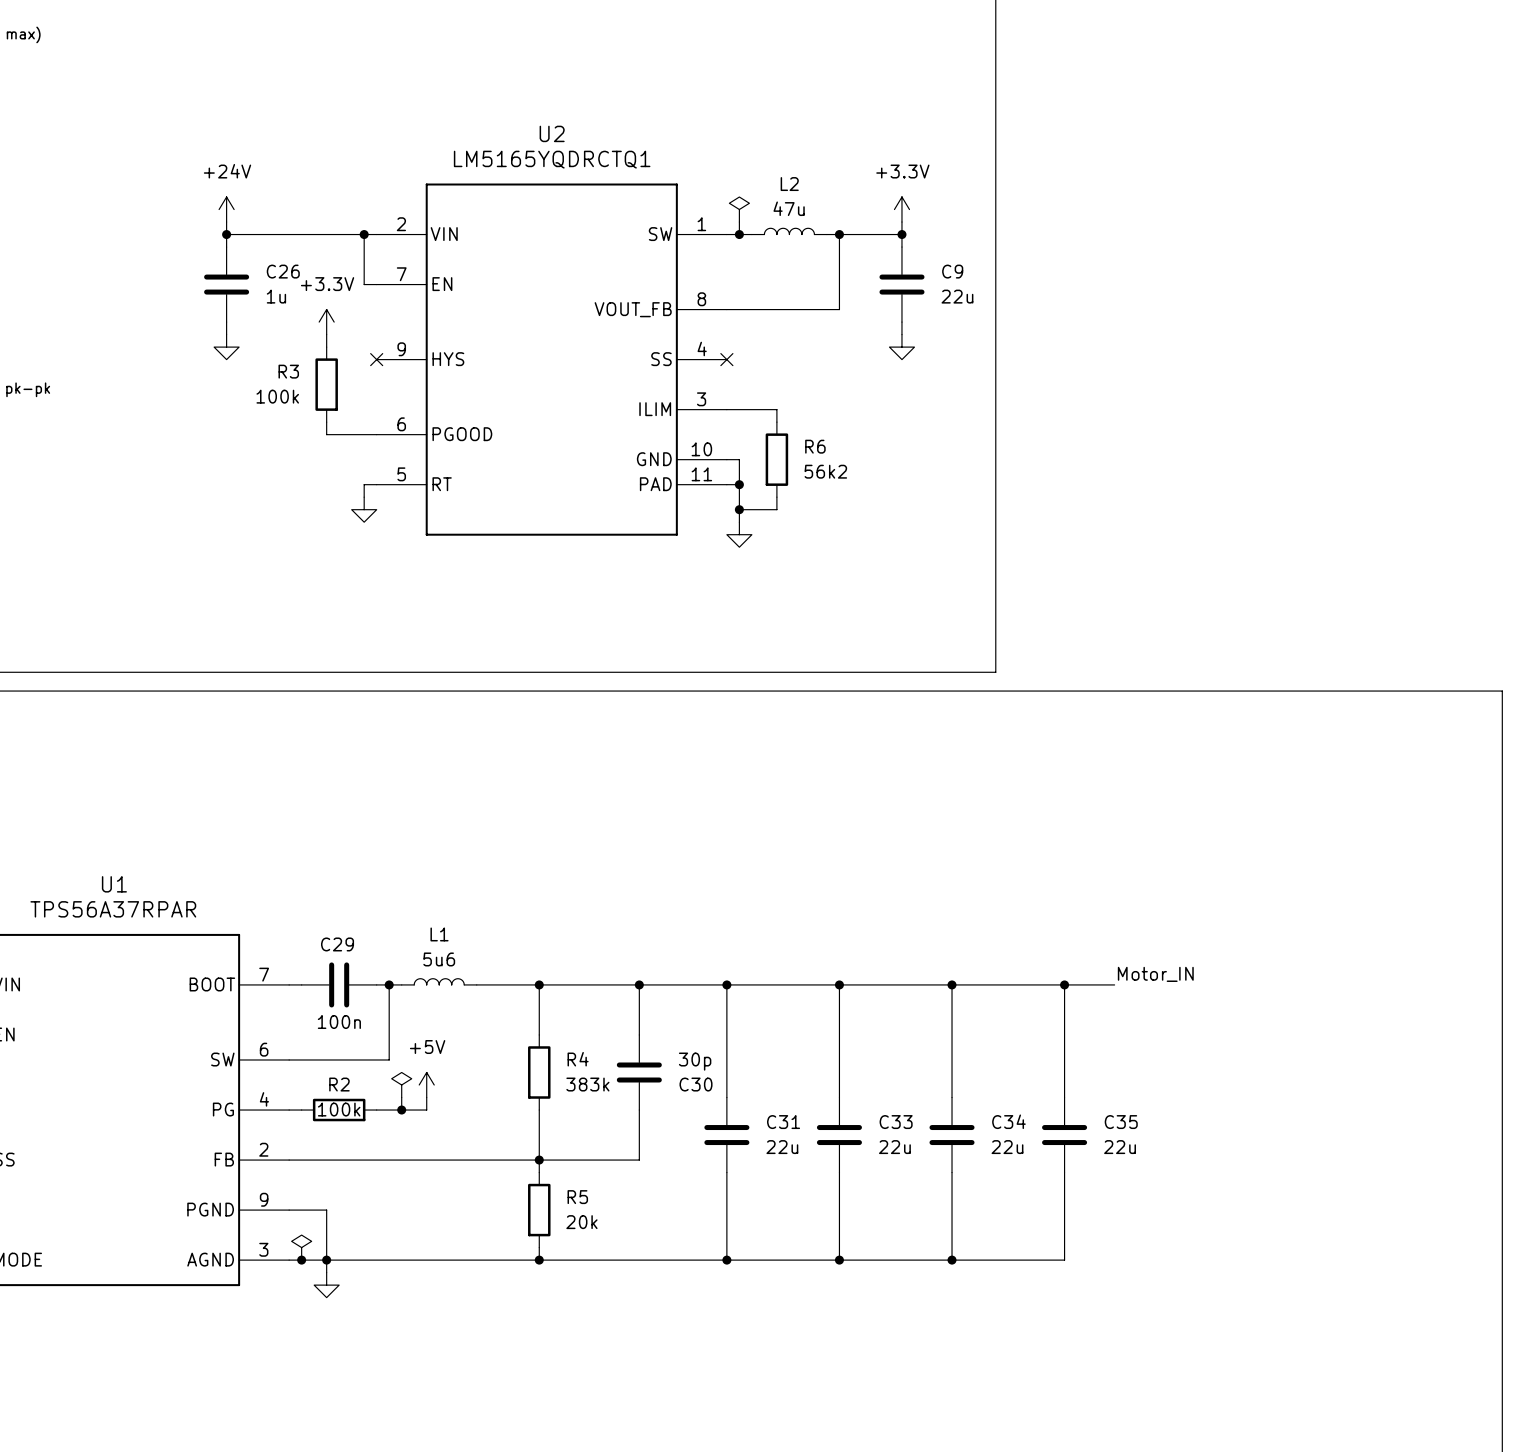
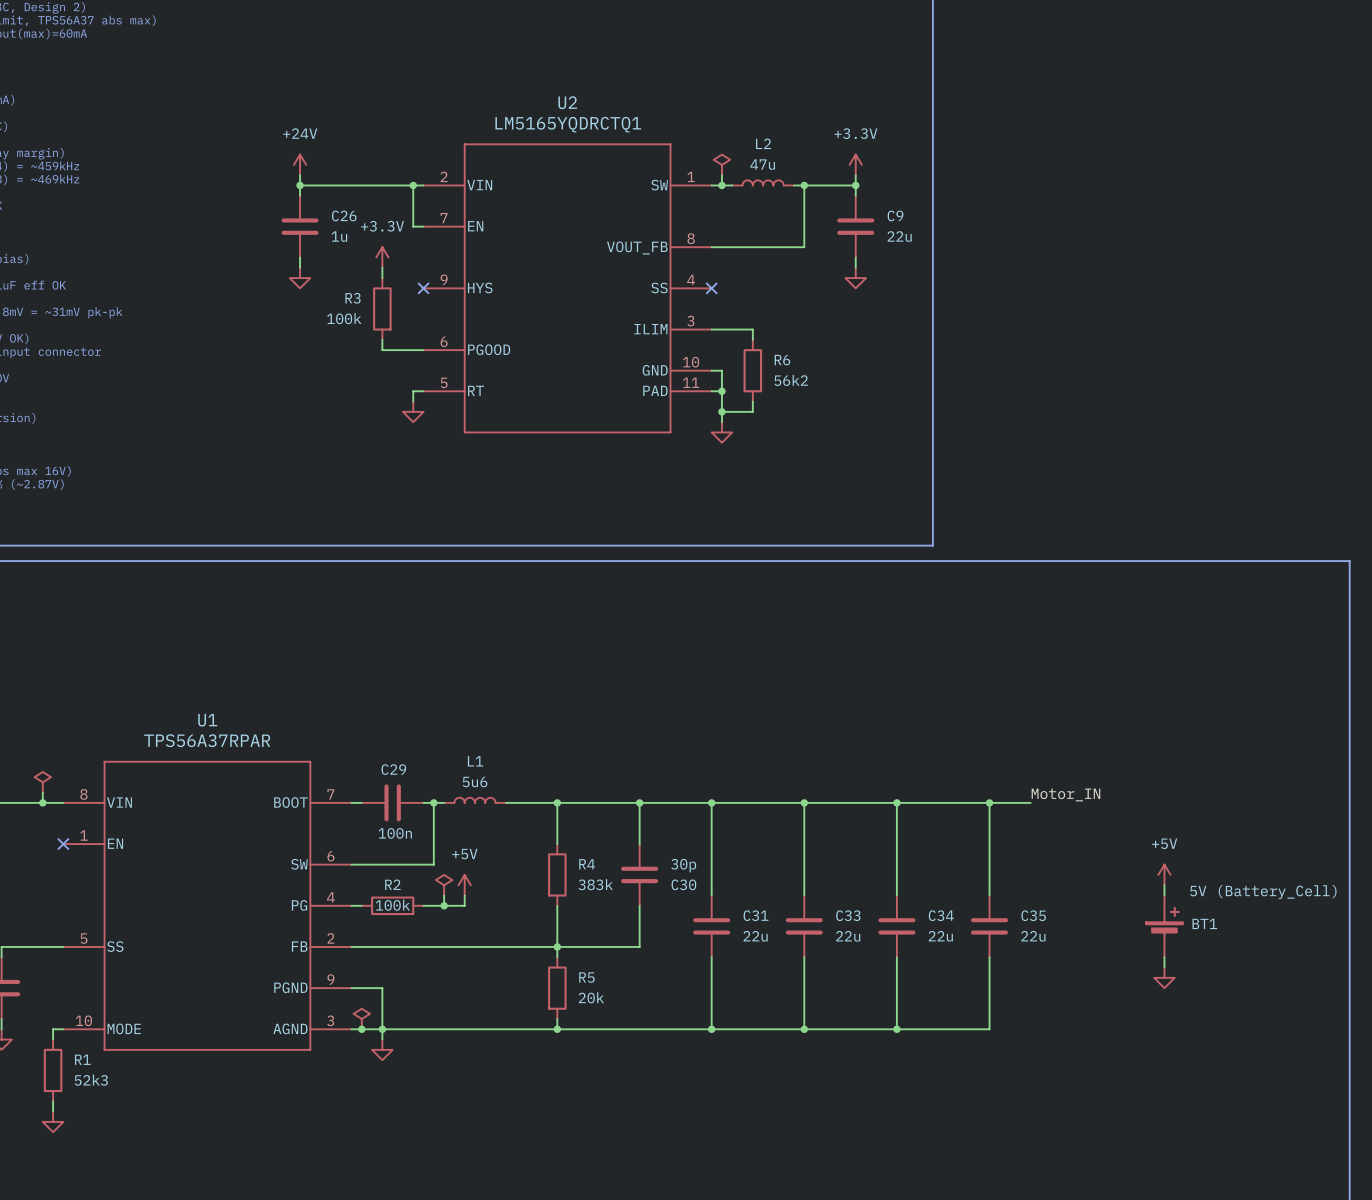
power symbol: none -> +5V (1164, 874)
wire: none -> (1164, 885) (1164, 895)
BT1: none -> 5V (Battery_Cell) (1164, 926)
wire: none -> (1164, 957) (1164, 967)
power symbol: none -> (1164, 977)

